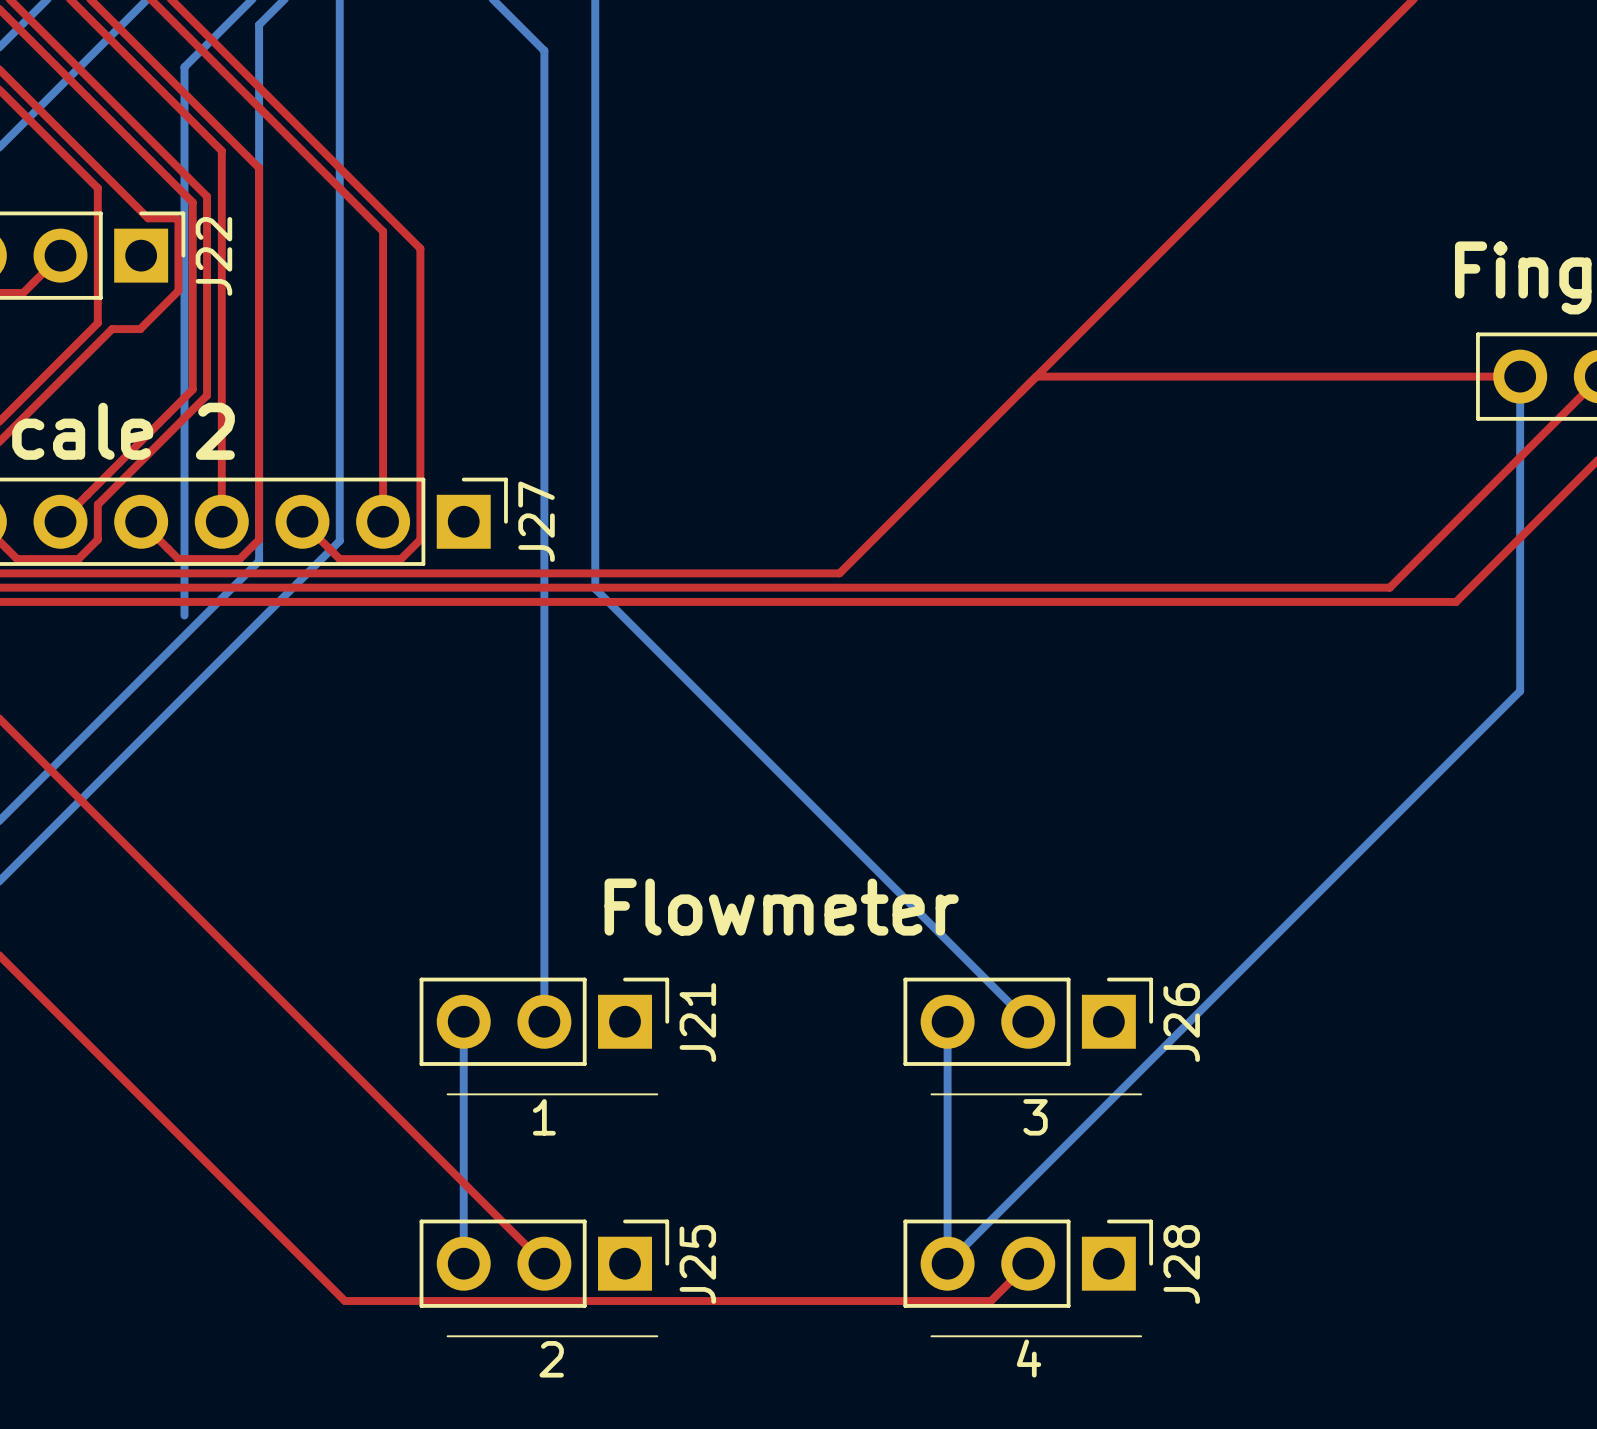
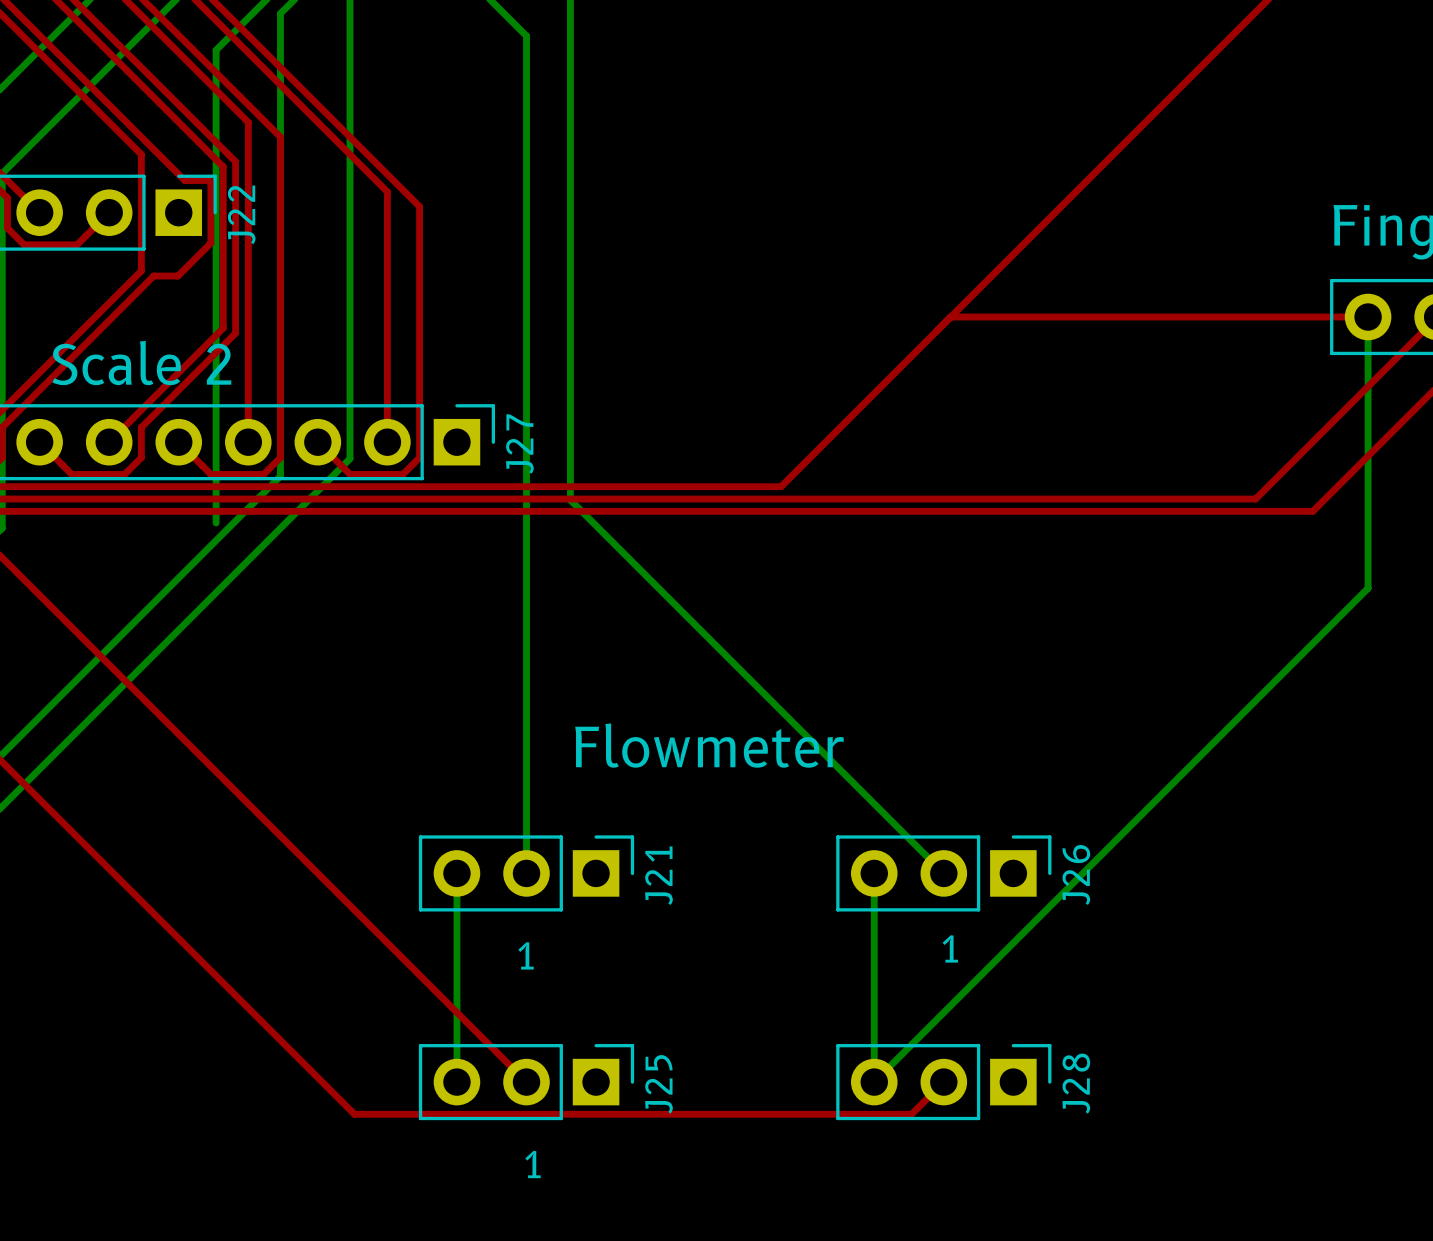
text position: Flowmeter (781, 907) -> Flowmeter (709, 745)
line: (447, 1094) (657, 1094) -> none
line: (931, 1094) (1141, 1094) -> none
text: 3 (1035, 1117) -> 1 (950, 948)
line: (447, 1336) (657, 1336) -> none
line: (931, 1336) (1141, 1336) -> none
text: 4 (1029, 1358) -> none
text: 2 (551, 1359) -> 1 (532, 1164)

